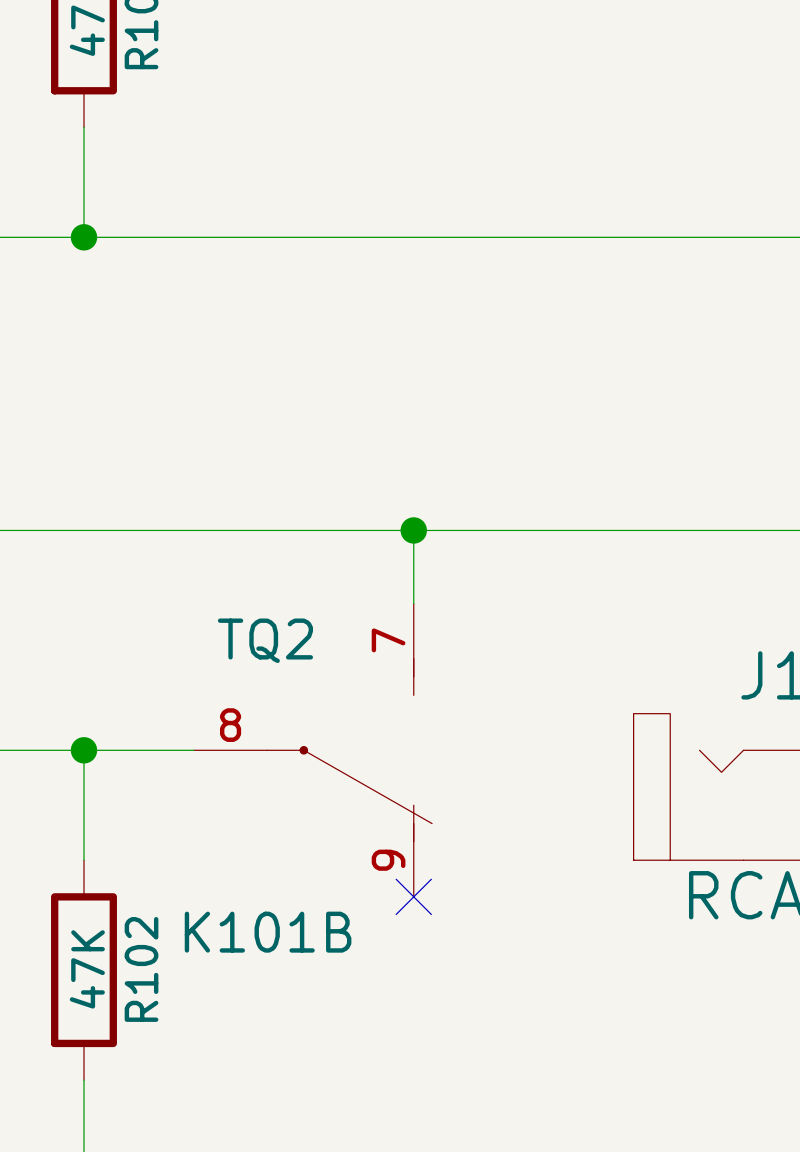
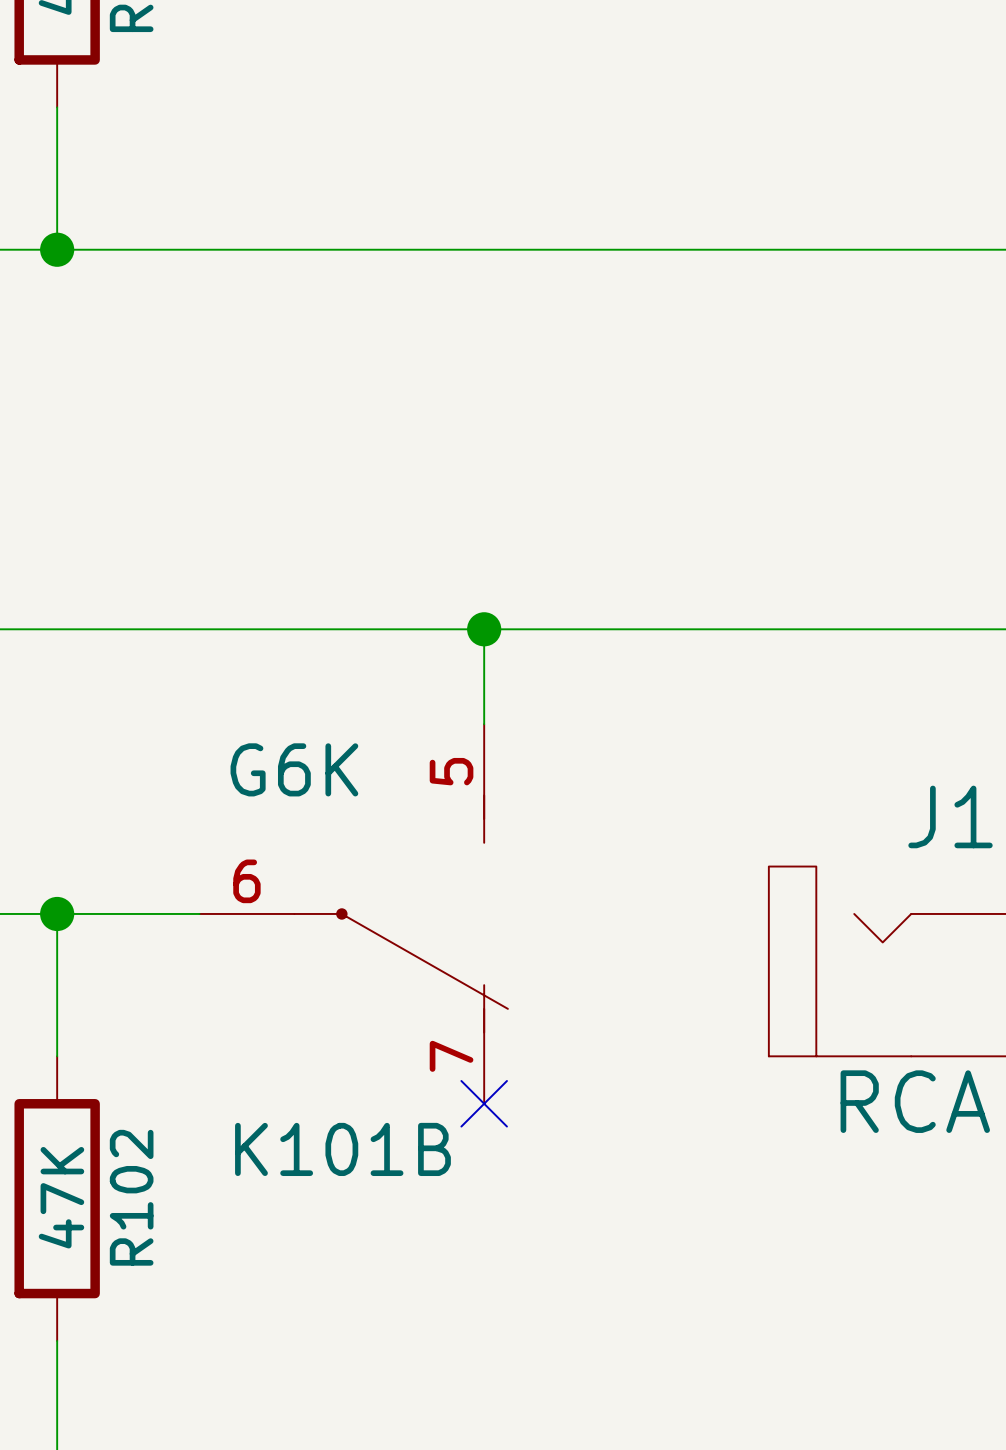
K101B value: TQ2 (265, 640) -> G6K (294, 769)
K101B pin number: 7 (388, 640) -> 5 (451, 771)
K101B pin number: 8 (230, 725) -> 6 (246, 881)
K101B pin number: 9 (388, 860) -> 7 (451, 1056)
K101B name position: K101B (268, 932) -> K101B (342, 1149)

